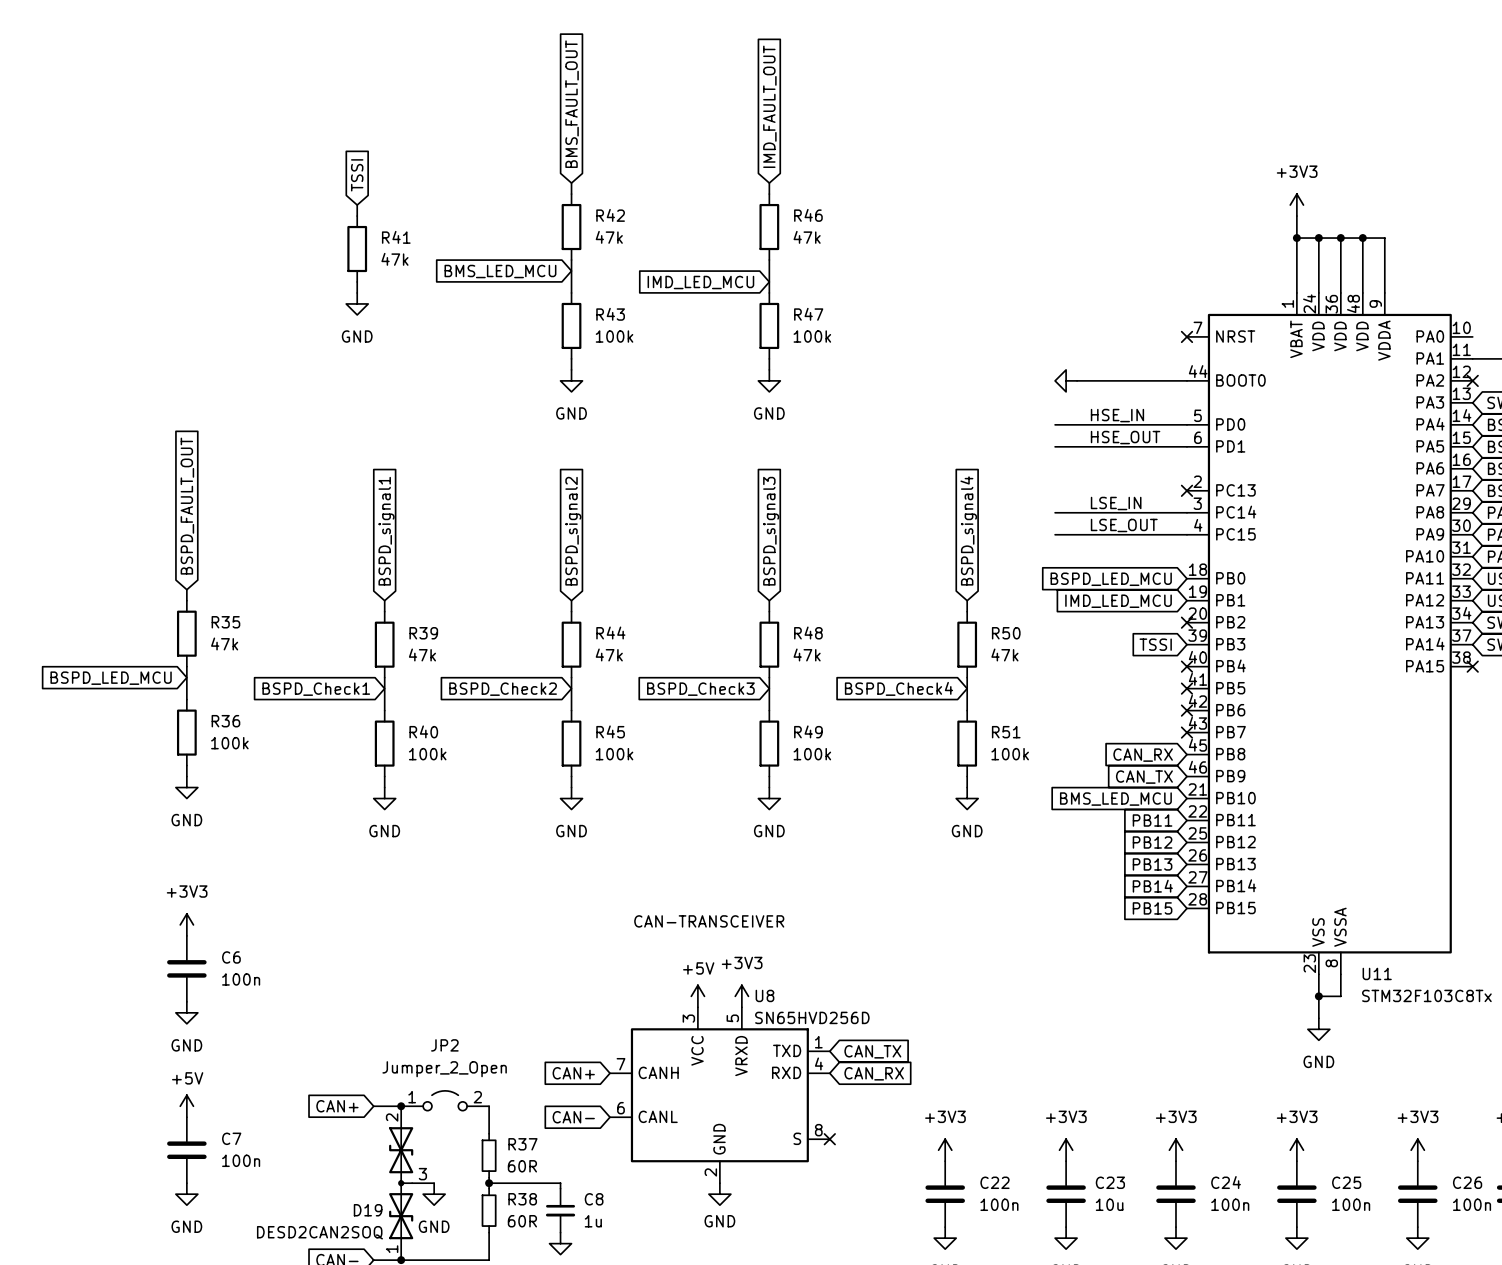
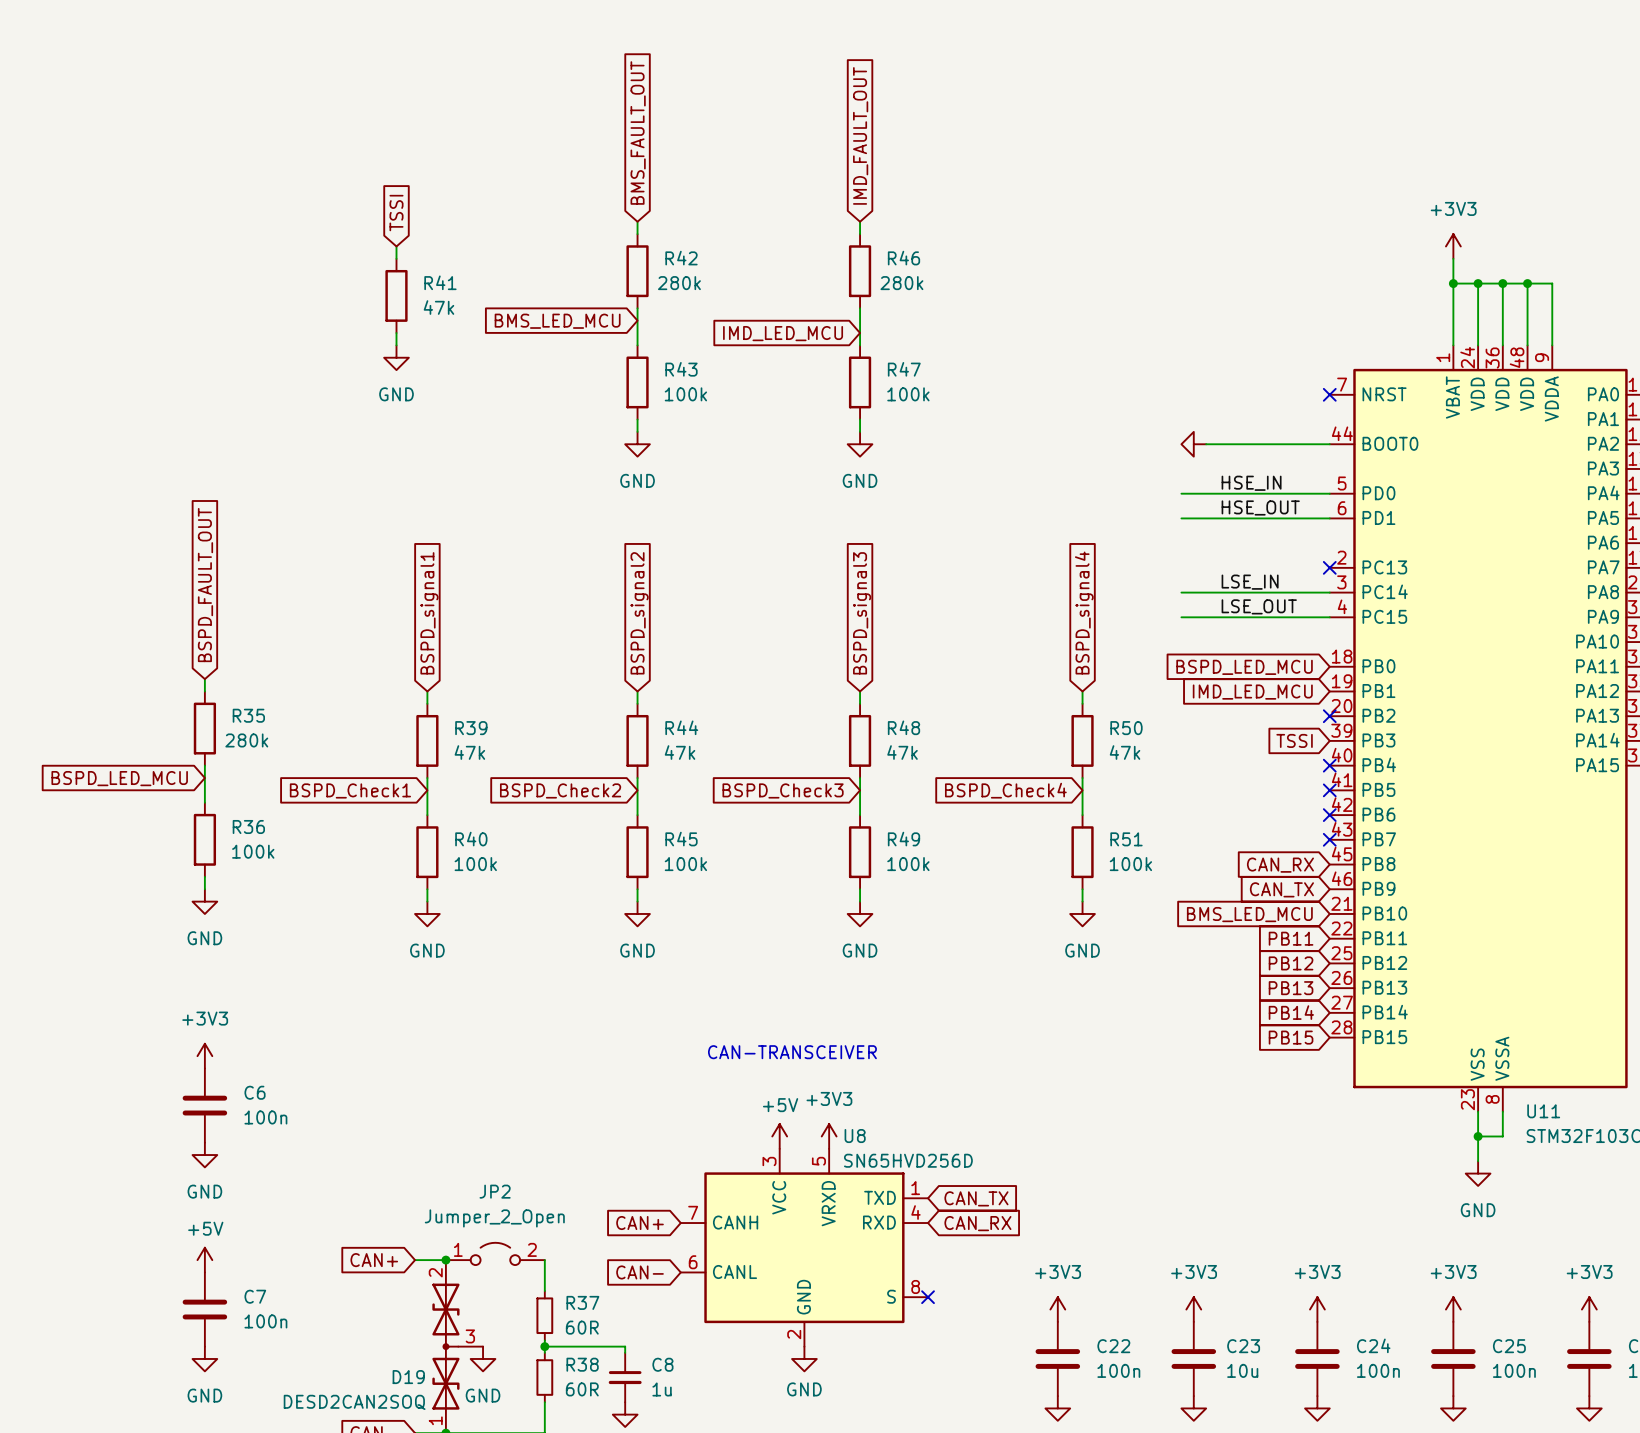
R42 value: 47k (609, 237) -> 280k (679, 283)
R46 value: 47k (807, 237) -> 280k (901, 283)
R35 value: 47k (224, 643) -> 280k (246, 740)

